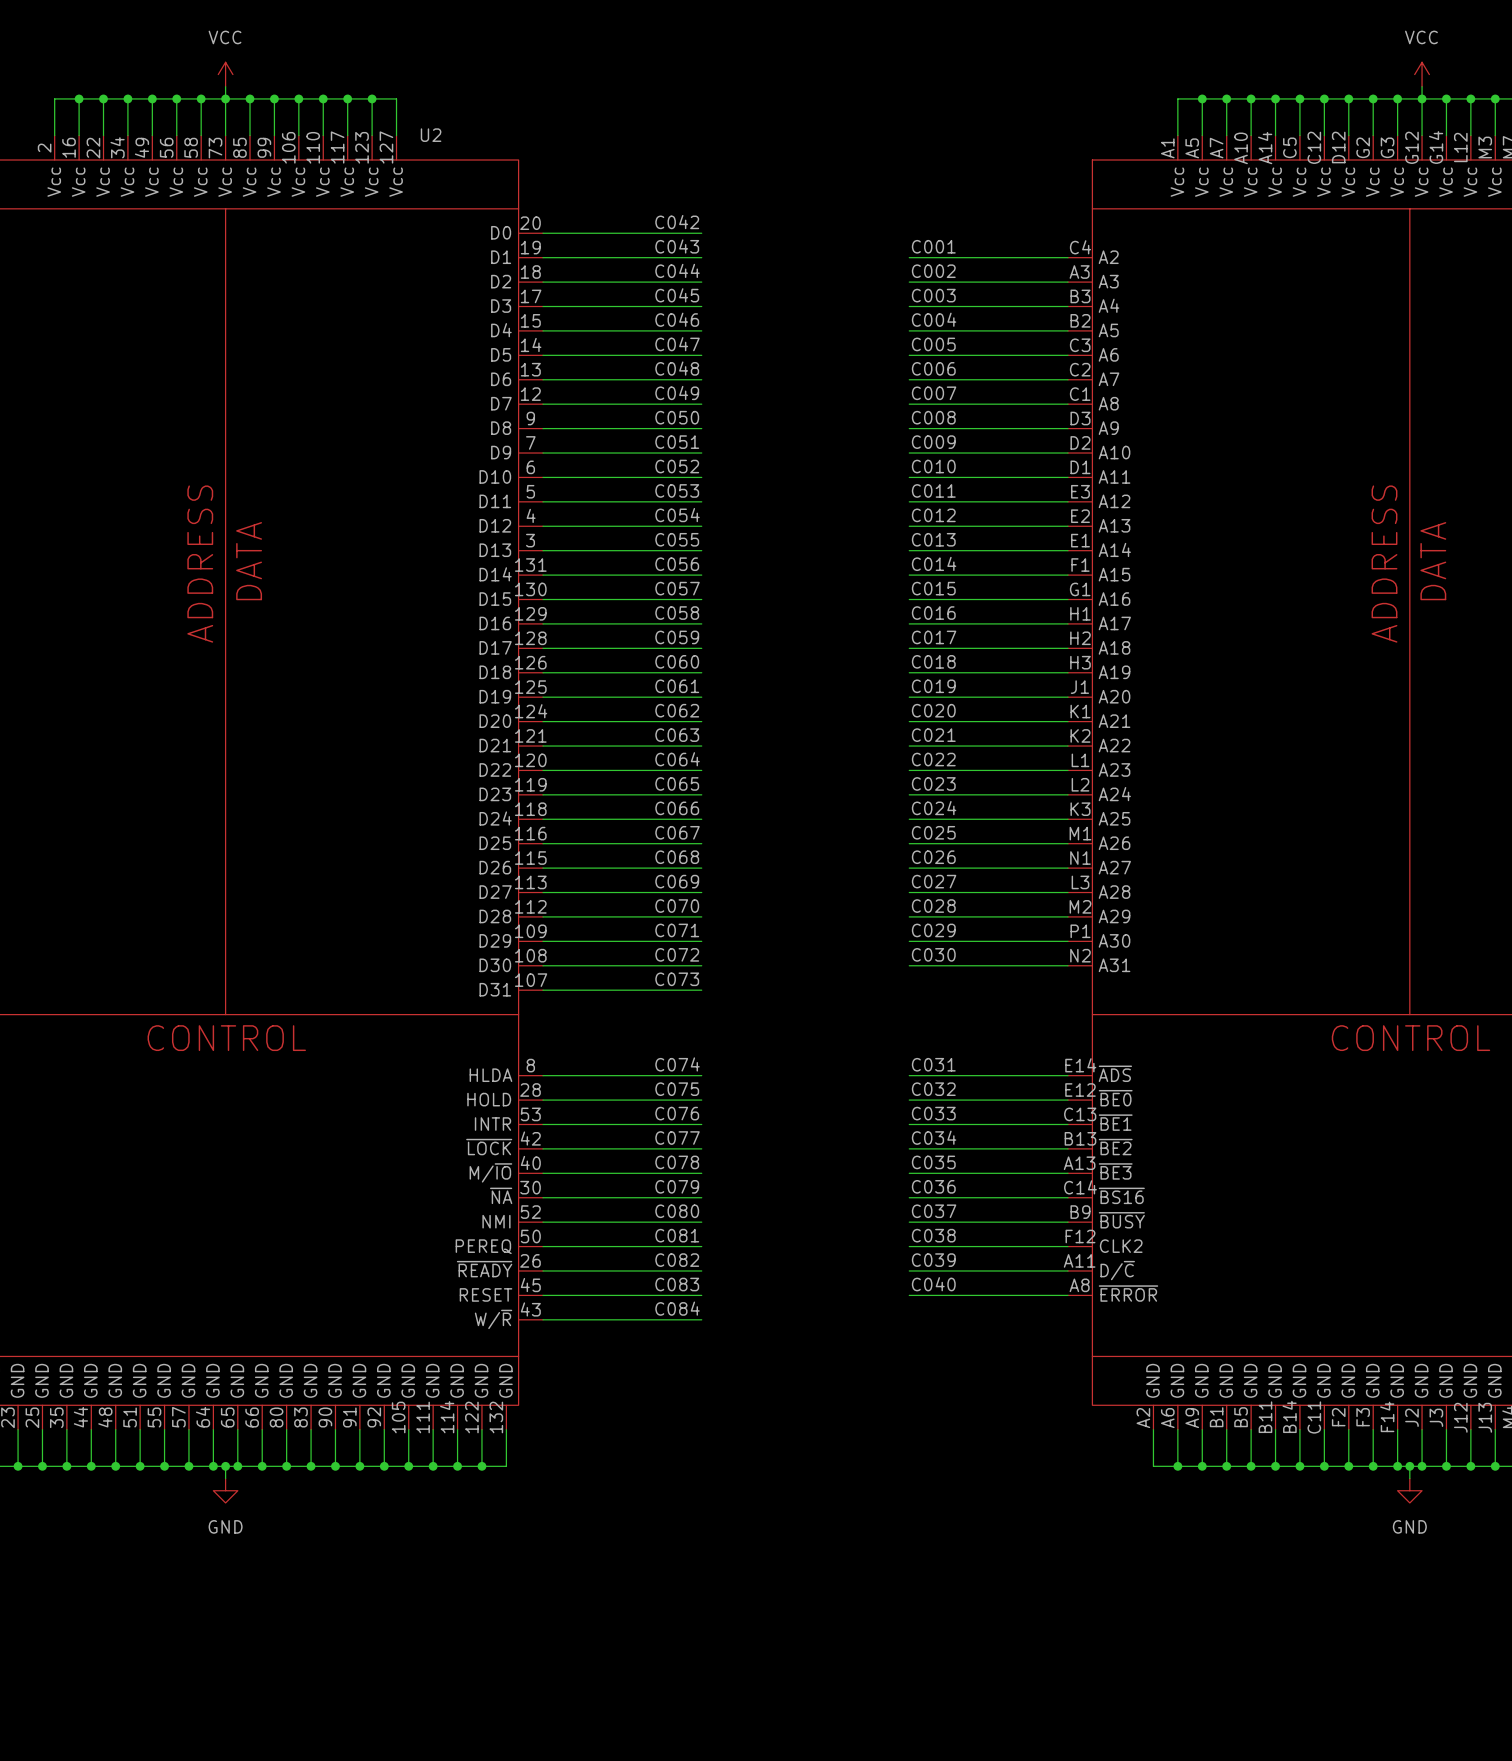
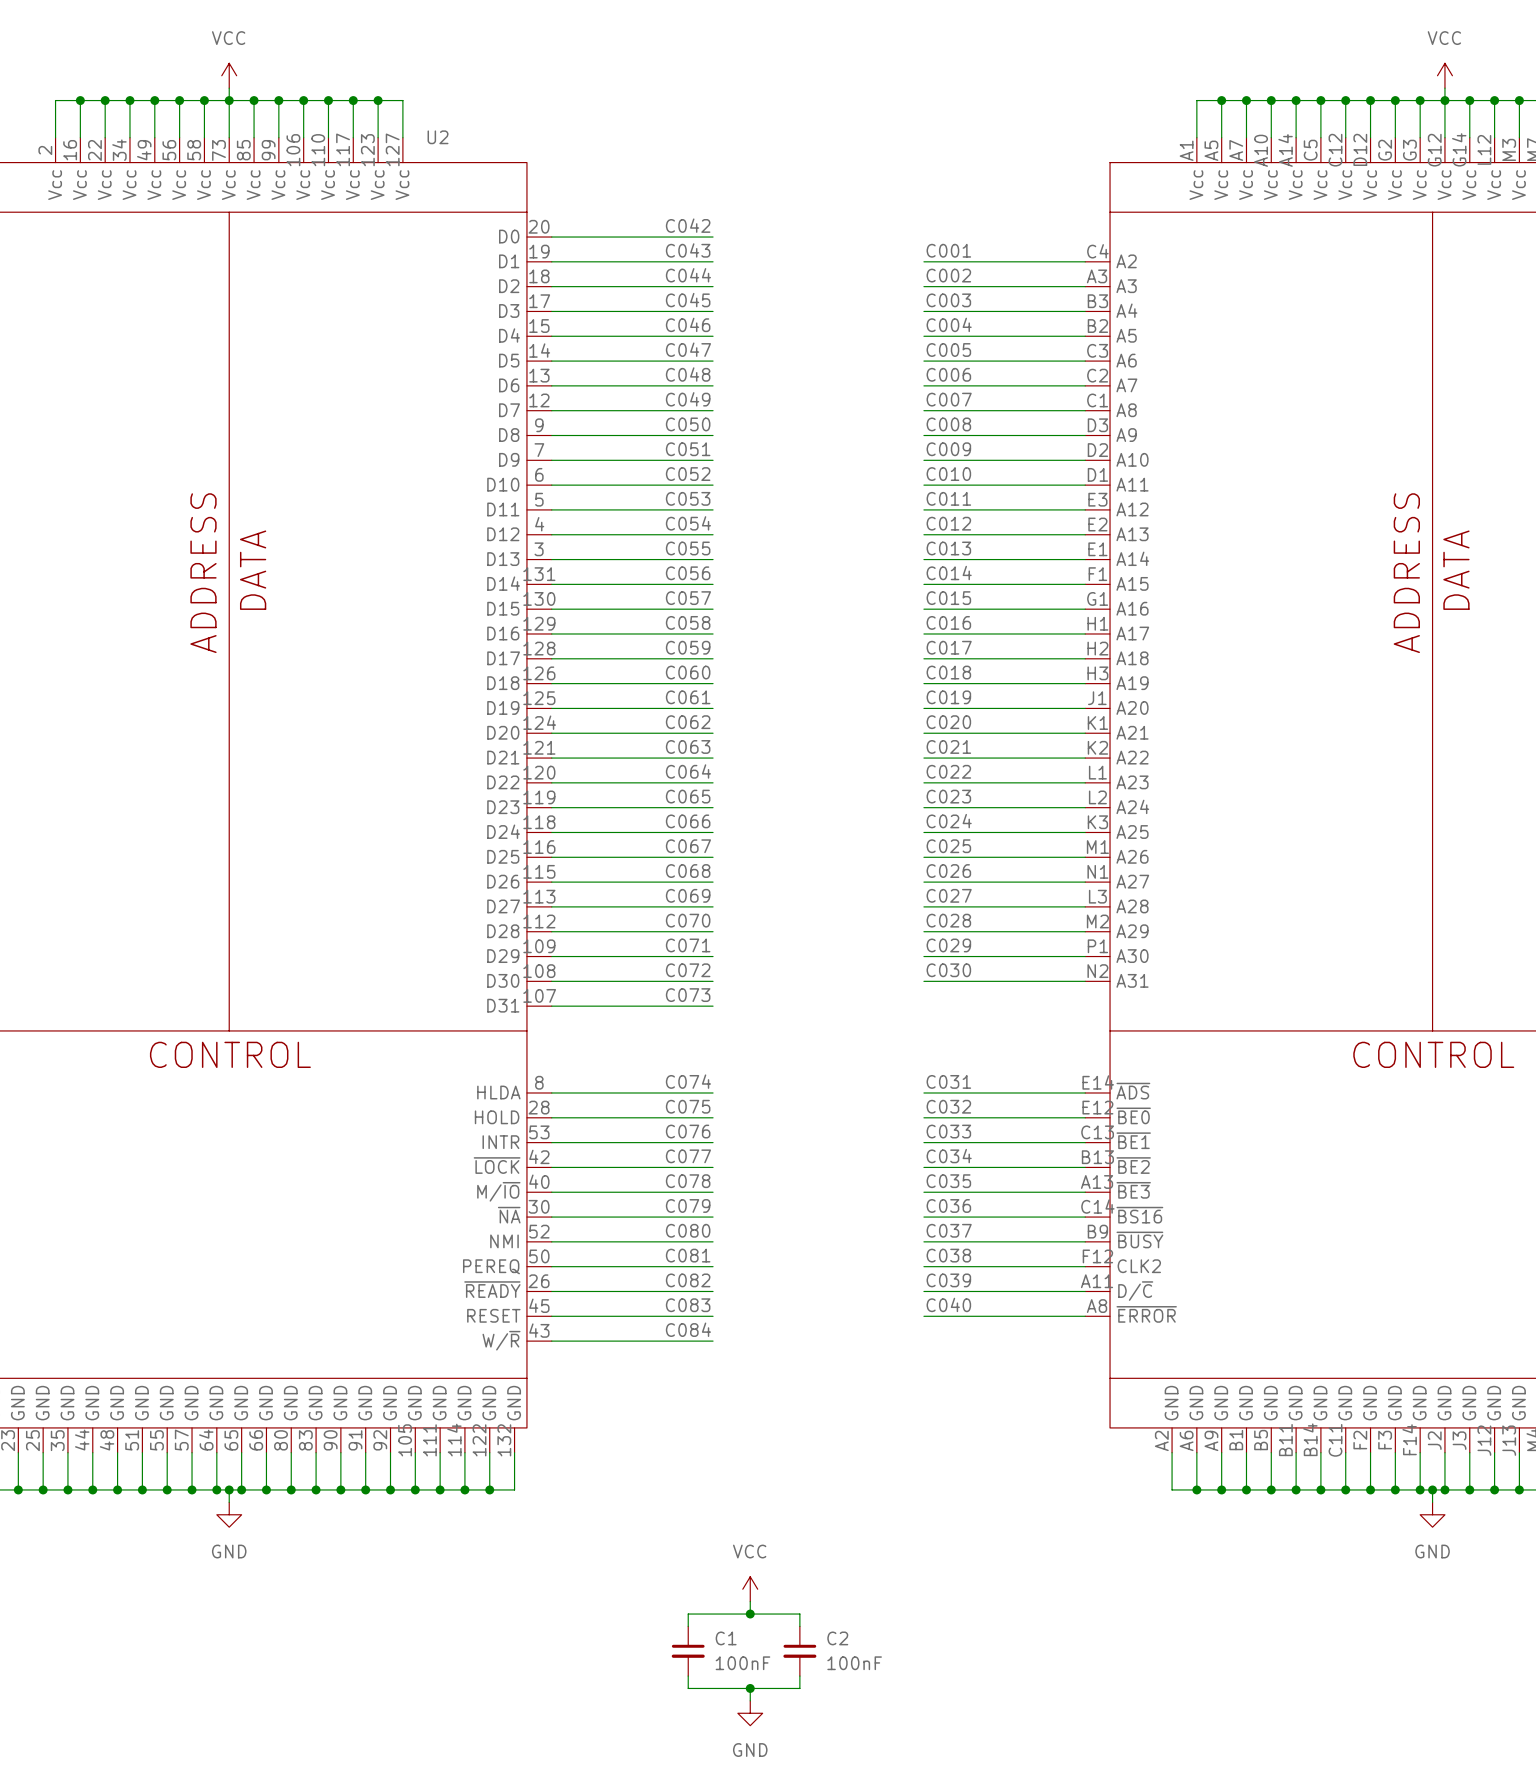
power symbol: none -> VCC (750, 1589)
wire: none -> (750, 1601) (750, 1614)
junction: none -> (750, 1614)
wire: none -> (688, 1626) (688, 1614) (799, 1614) (799, 1626)
C1: none -> 100nF (688, 1651)
C2: none -> 100nF (799, 1651)
wire: none -> (688, 1676) (688, 1688) (799, 1688) (799, 1676)
wire: none -> (750, 1688) (750, 1700)
junction: none -> (750, 1688)
power symbol: none -> GND (750, 1713)

